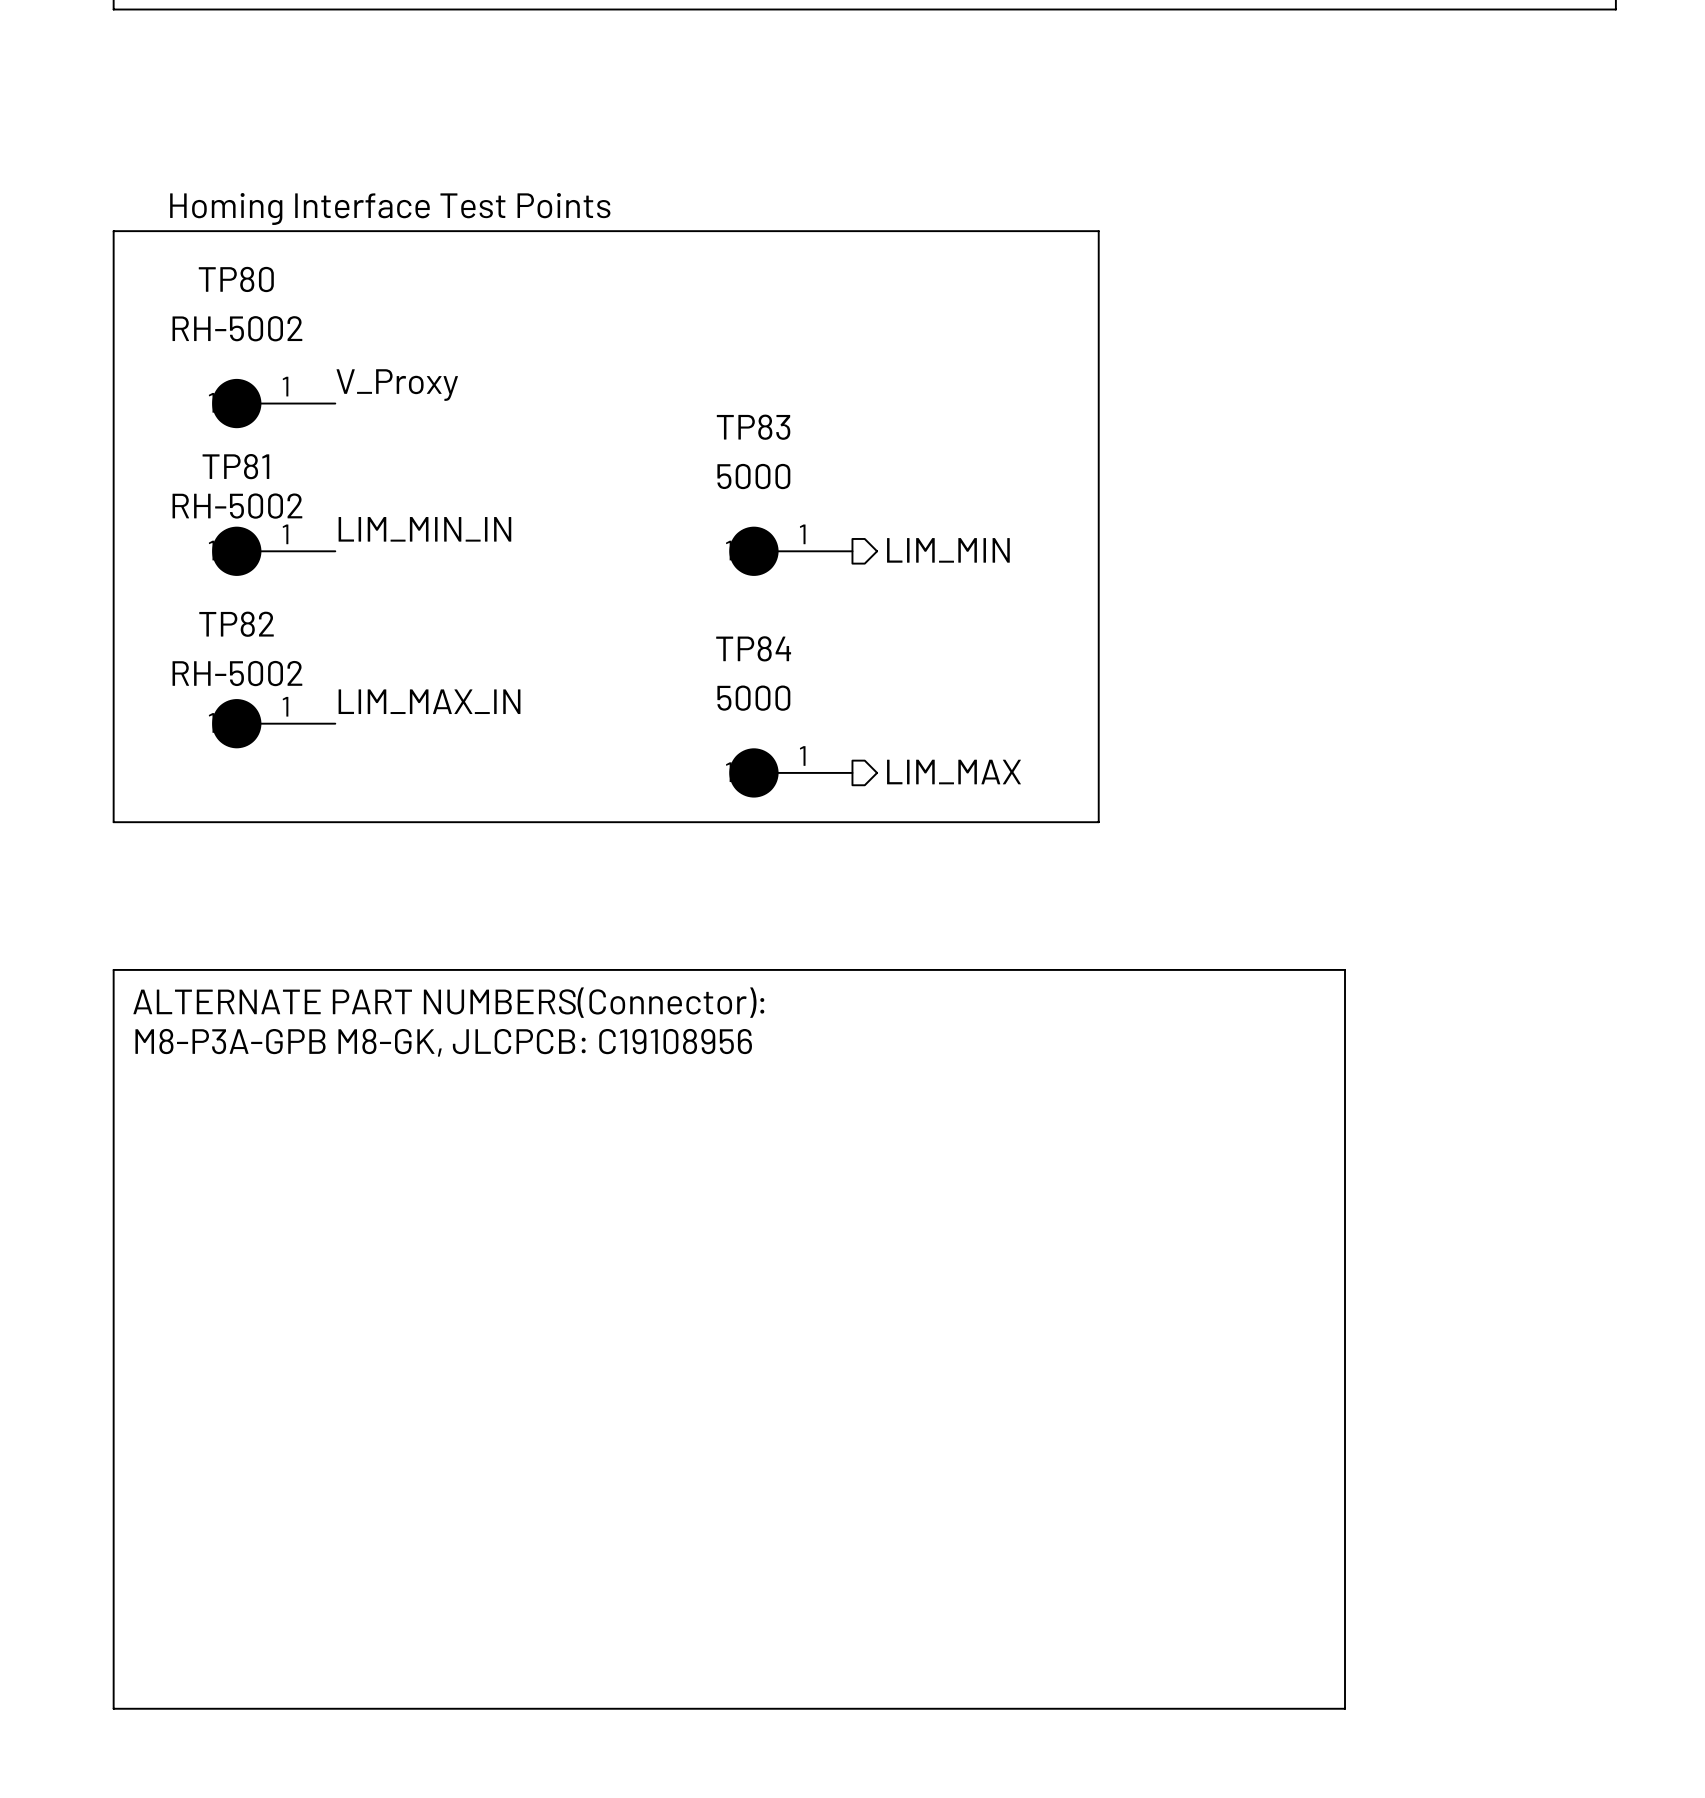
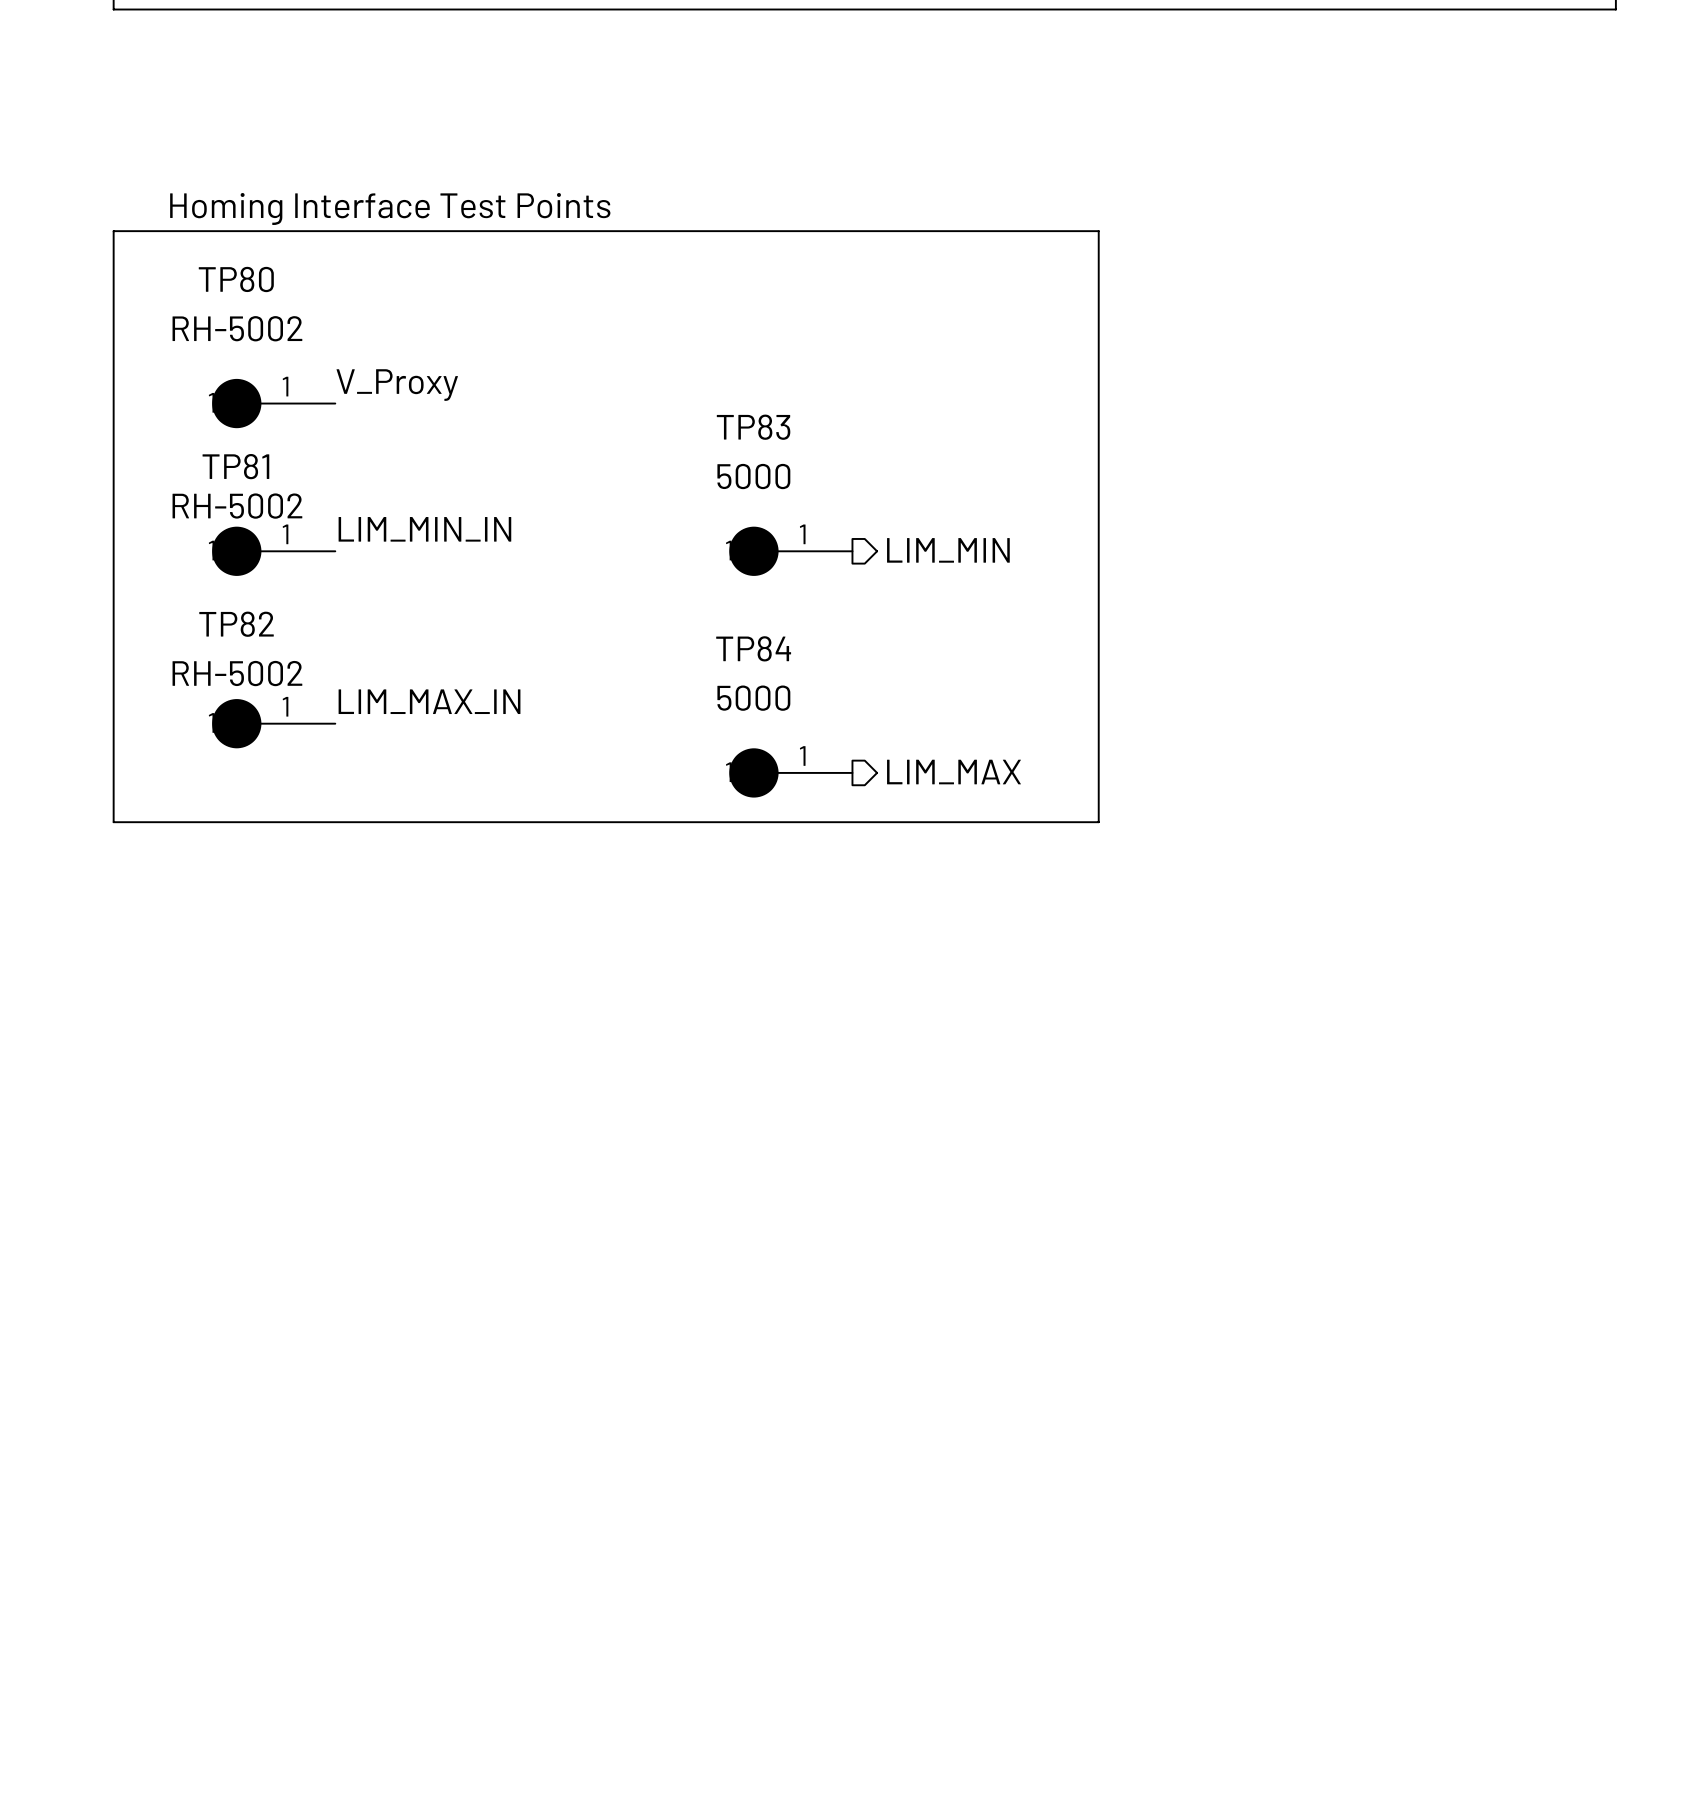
line: (113, 969) (1345, 969) (1345, 1708) (113, 1708) (113, 969) -> none
text: ALTERNATE PART NUMBERS(Connector): (448, 1002) -> none
text: M8-P3A-GPB M8-GK, JLCPCB: C19108956 (443, 1042) -> none

